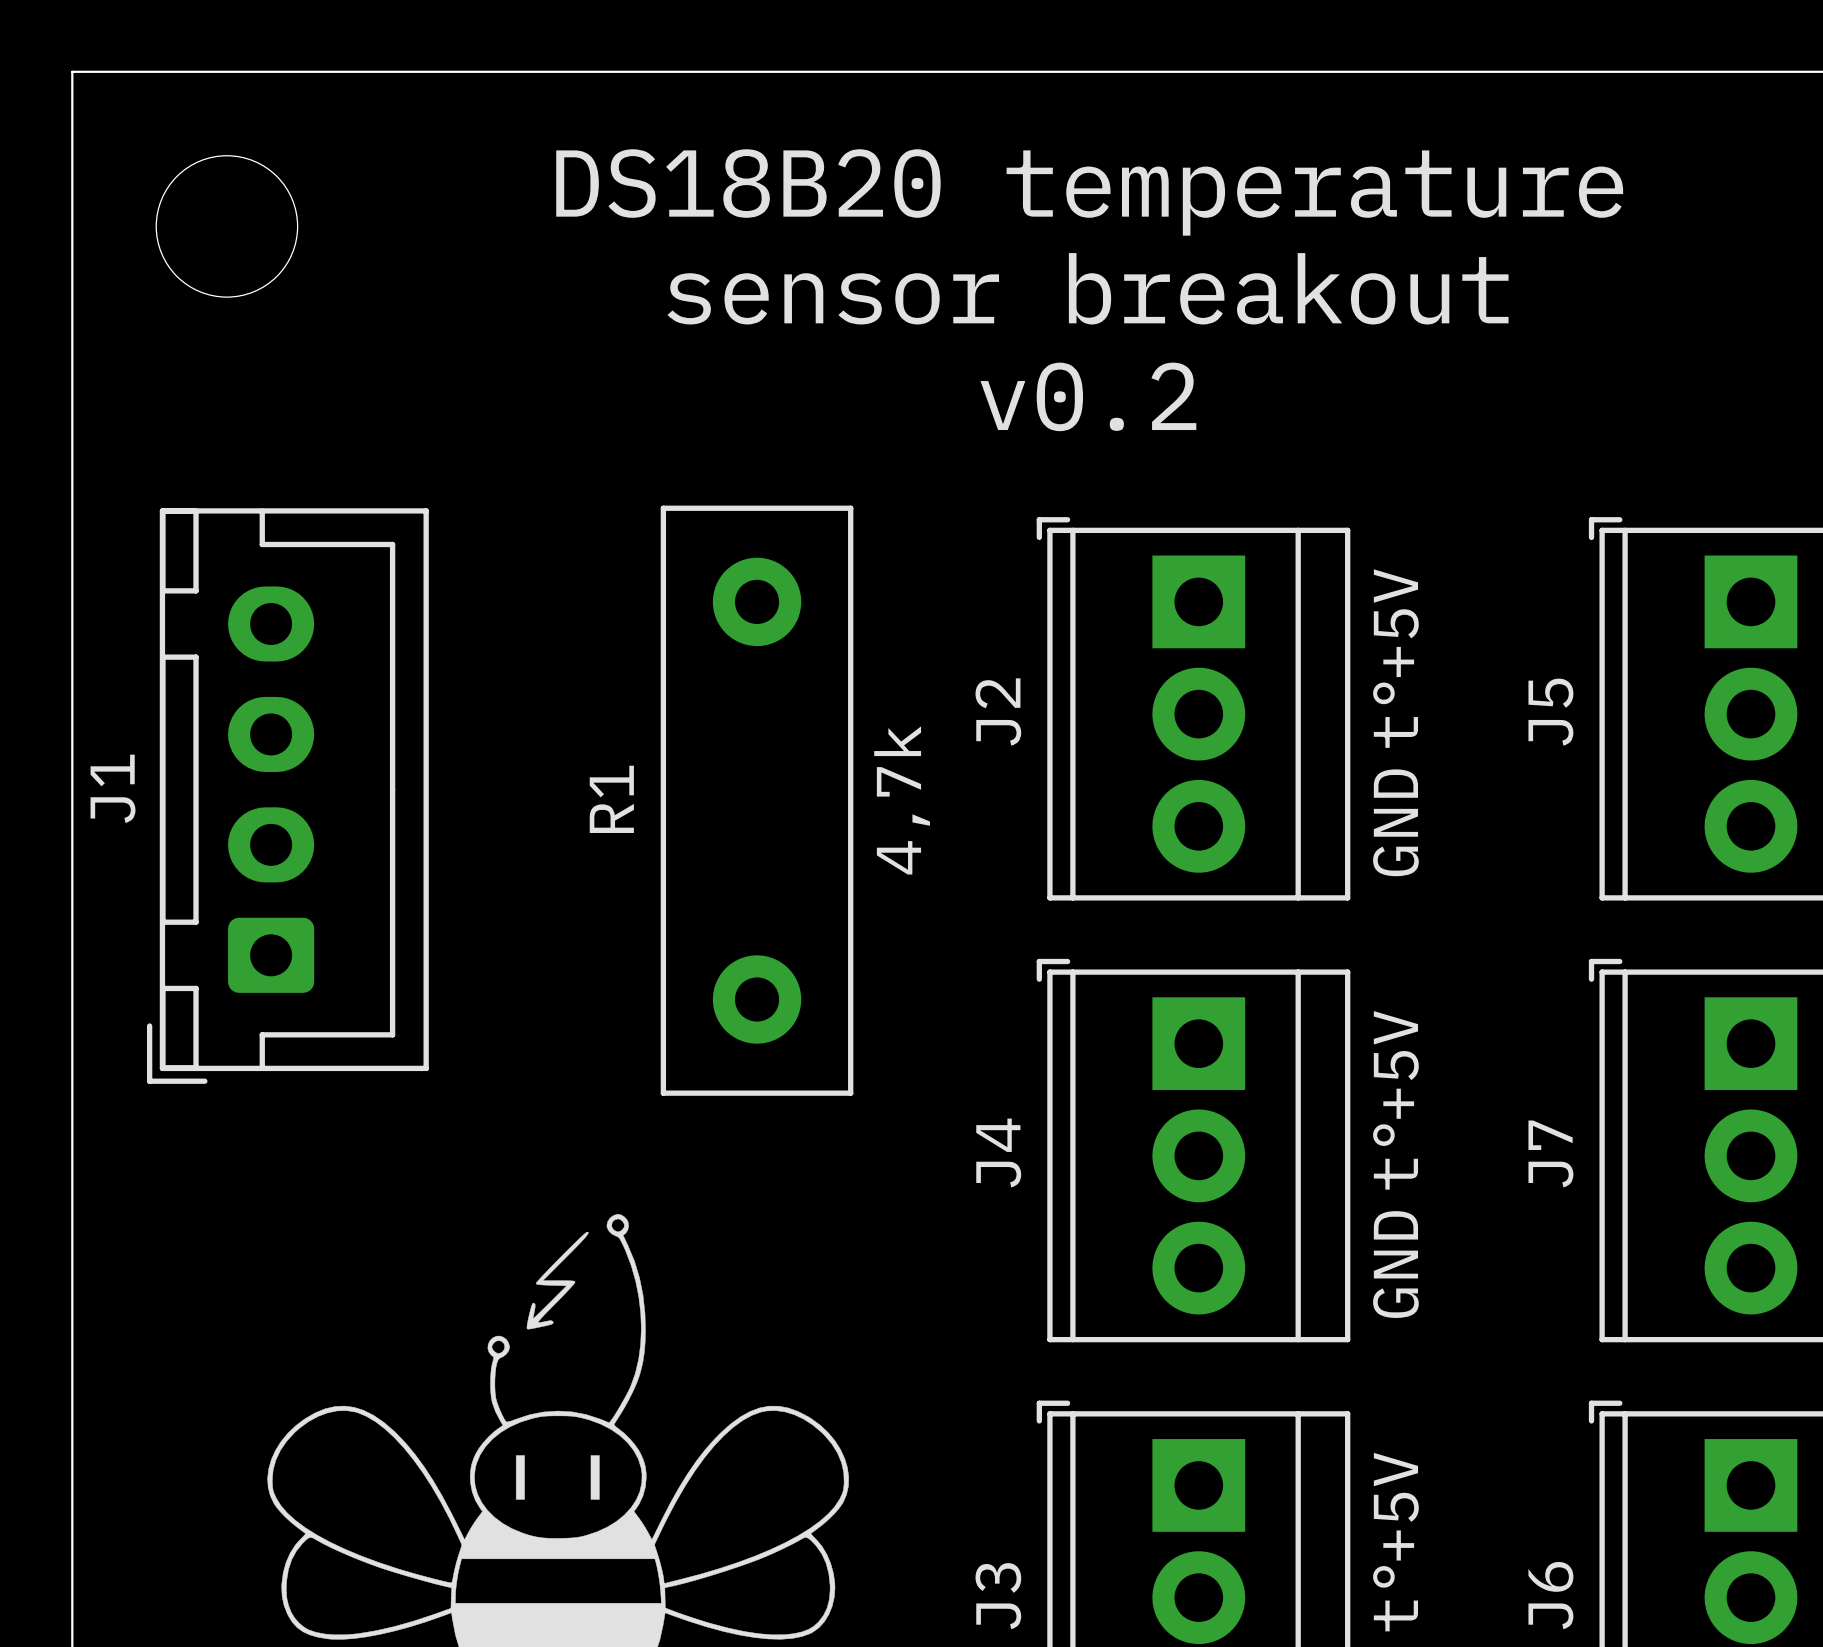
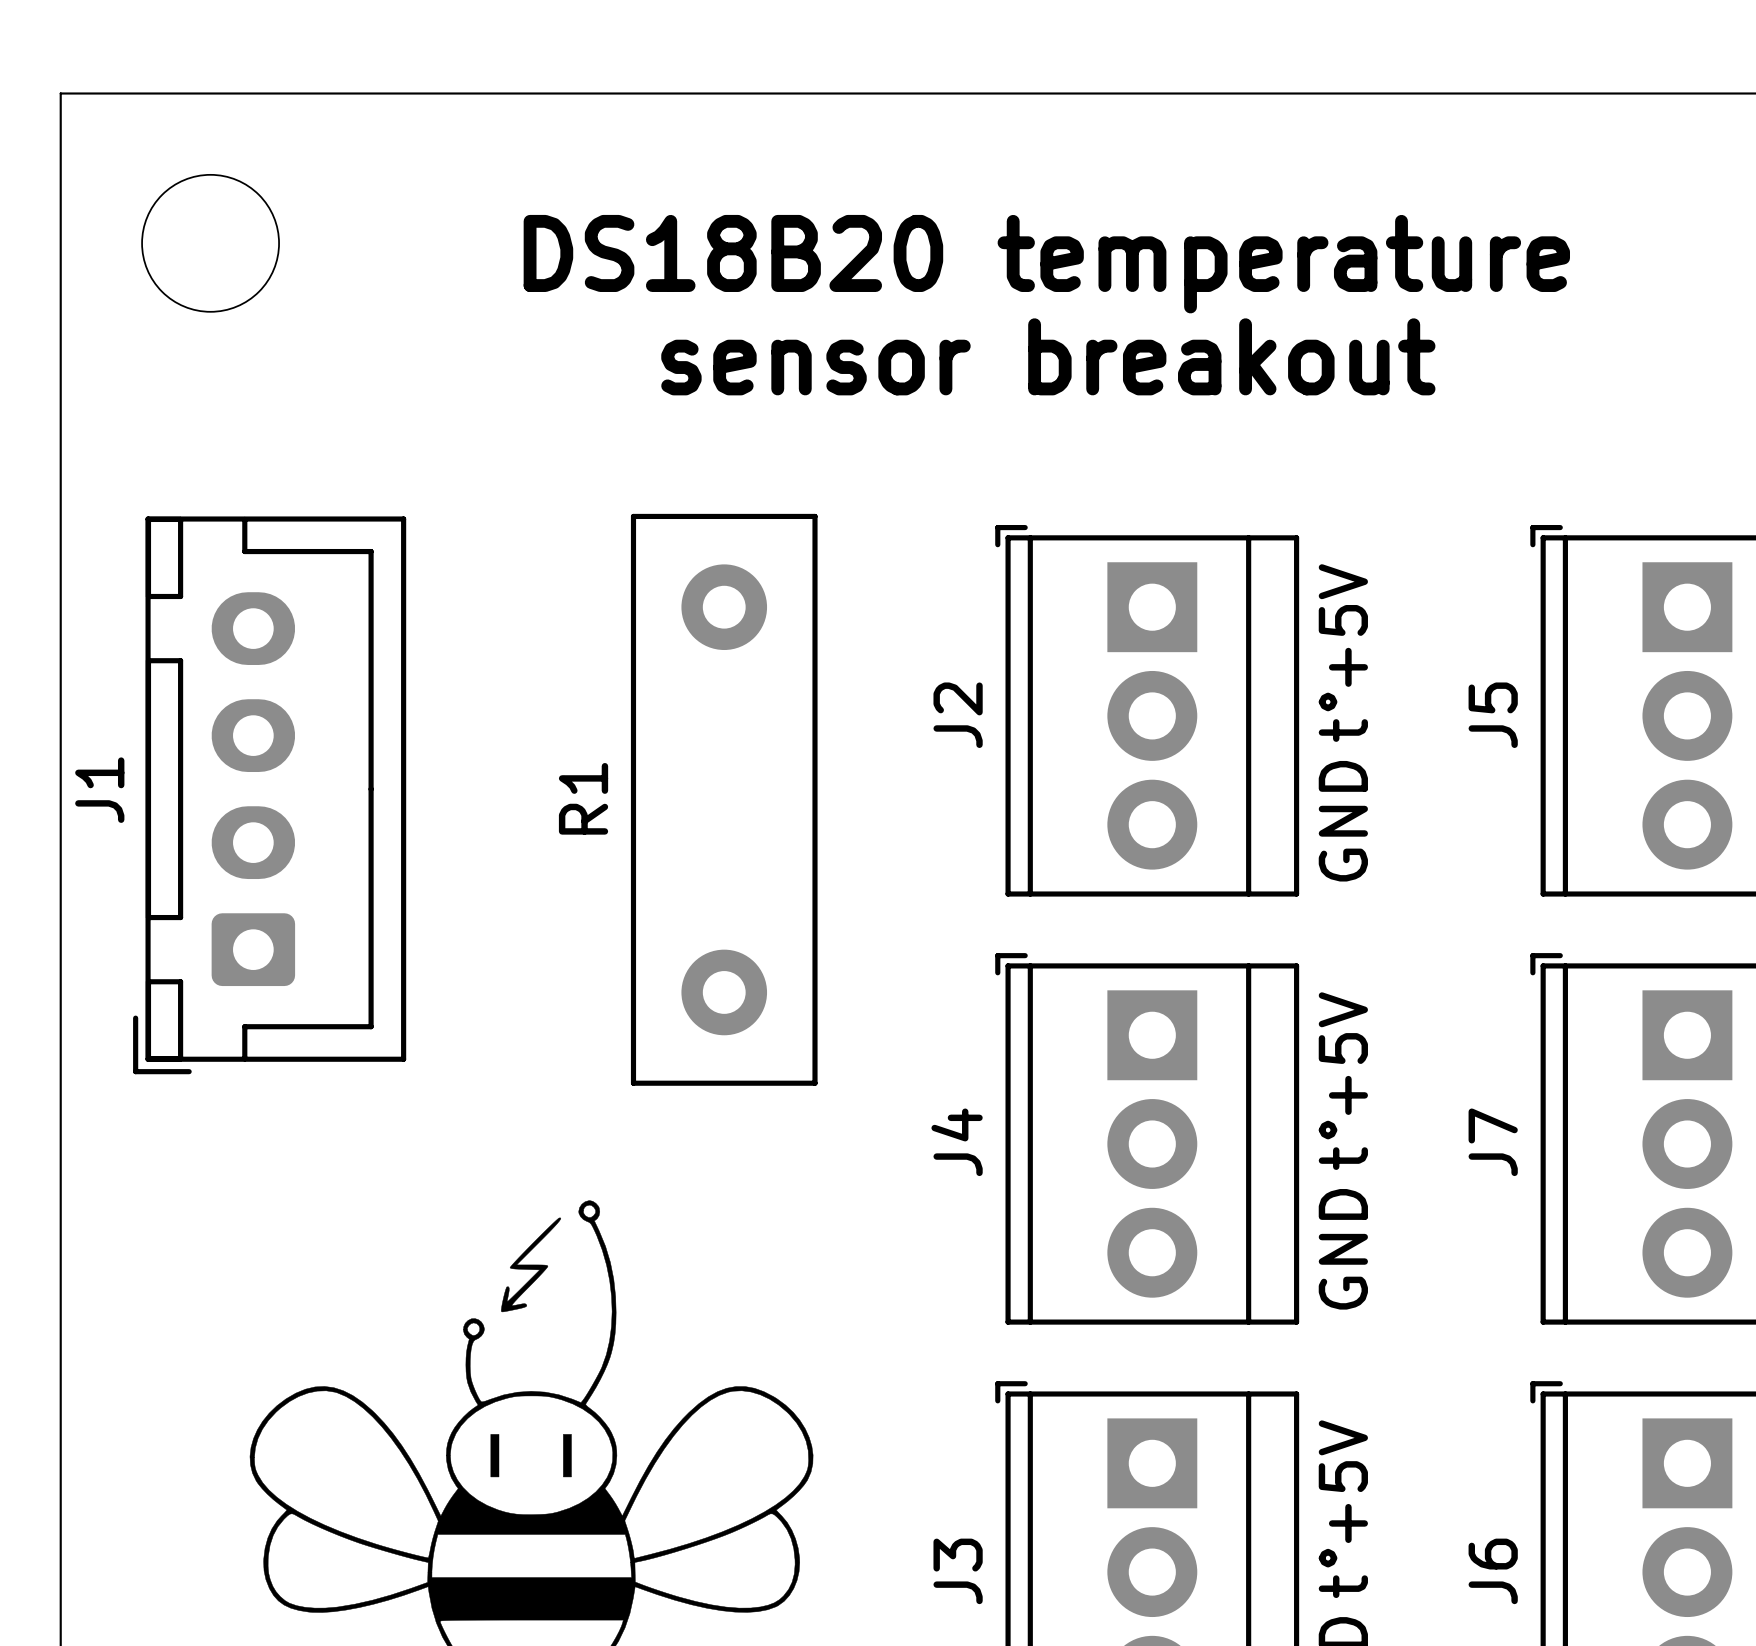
text position: DS18B20 temperature (1089, 192) -> DS18B20 temperature (1046, 264)
text position: sensor breakout (1088, 288) -> sensor breakout (1048, 356)
text: v0.2 (1088, 396) -> none
R1 value: 4,7k (902, 800) -> none

